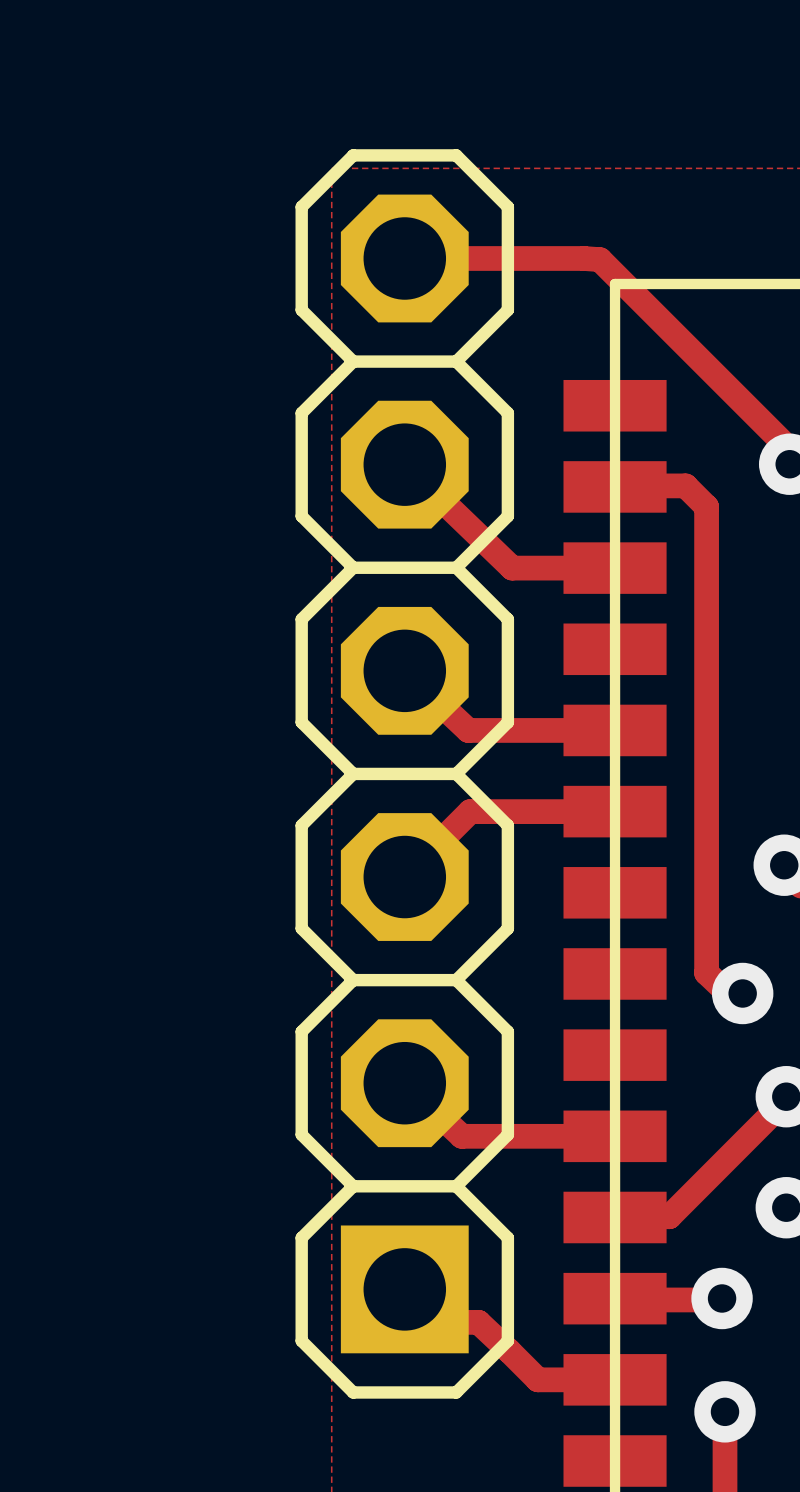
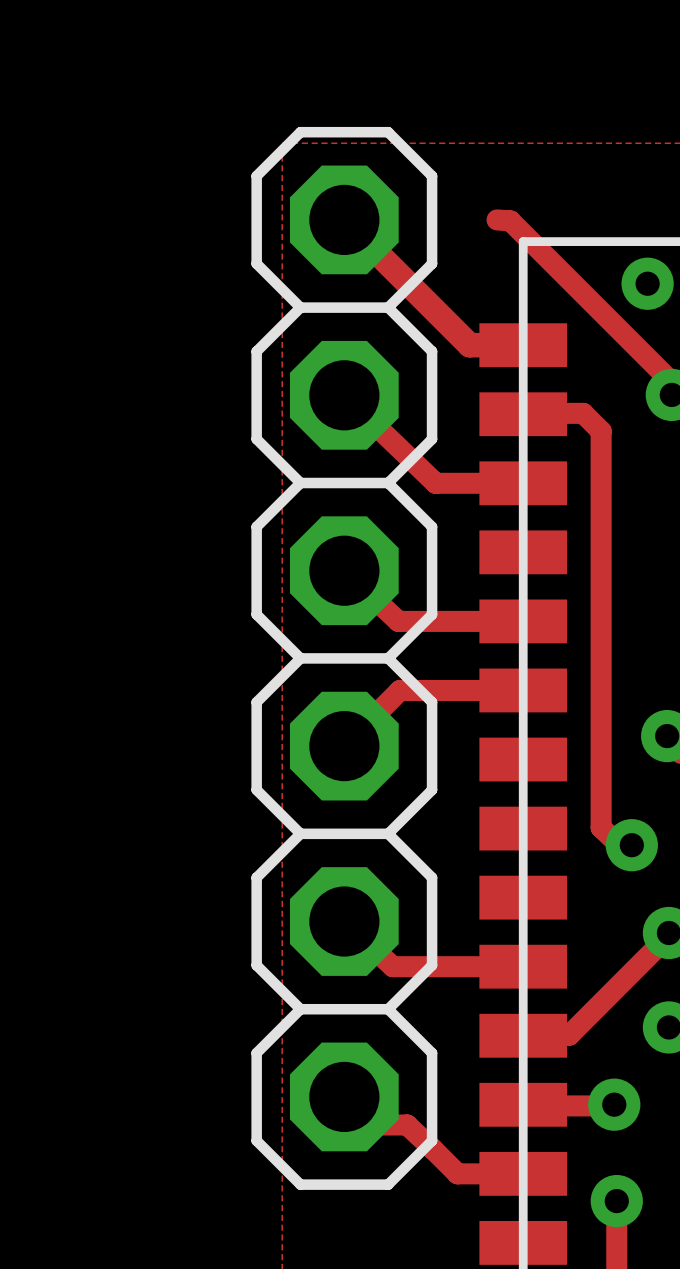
part footprint: [295, 149, 515, 1399] -> [251, 126, 438, 1190]
track: (404, 258) (584, 258) -> (344, 219) (469, 345) (523, 345)
via: none -> (647, 283)

